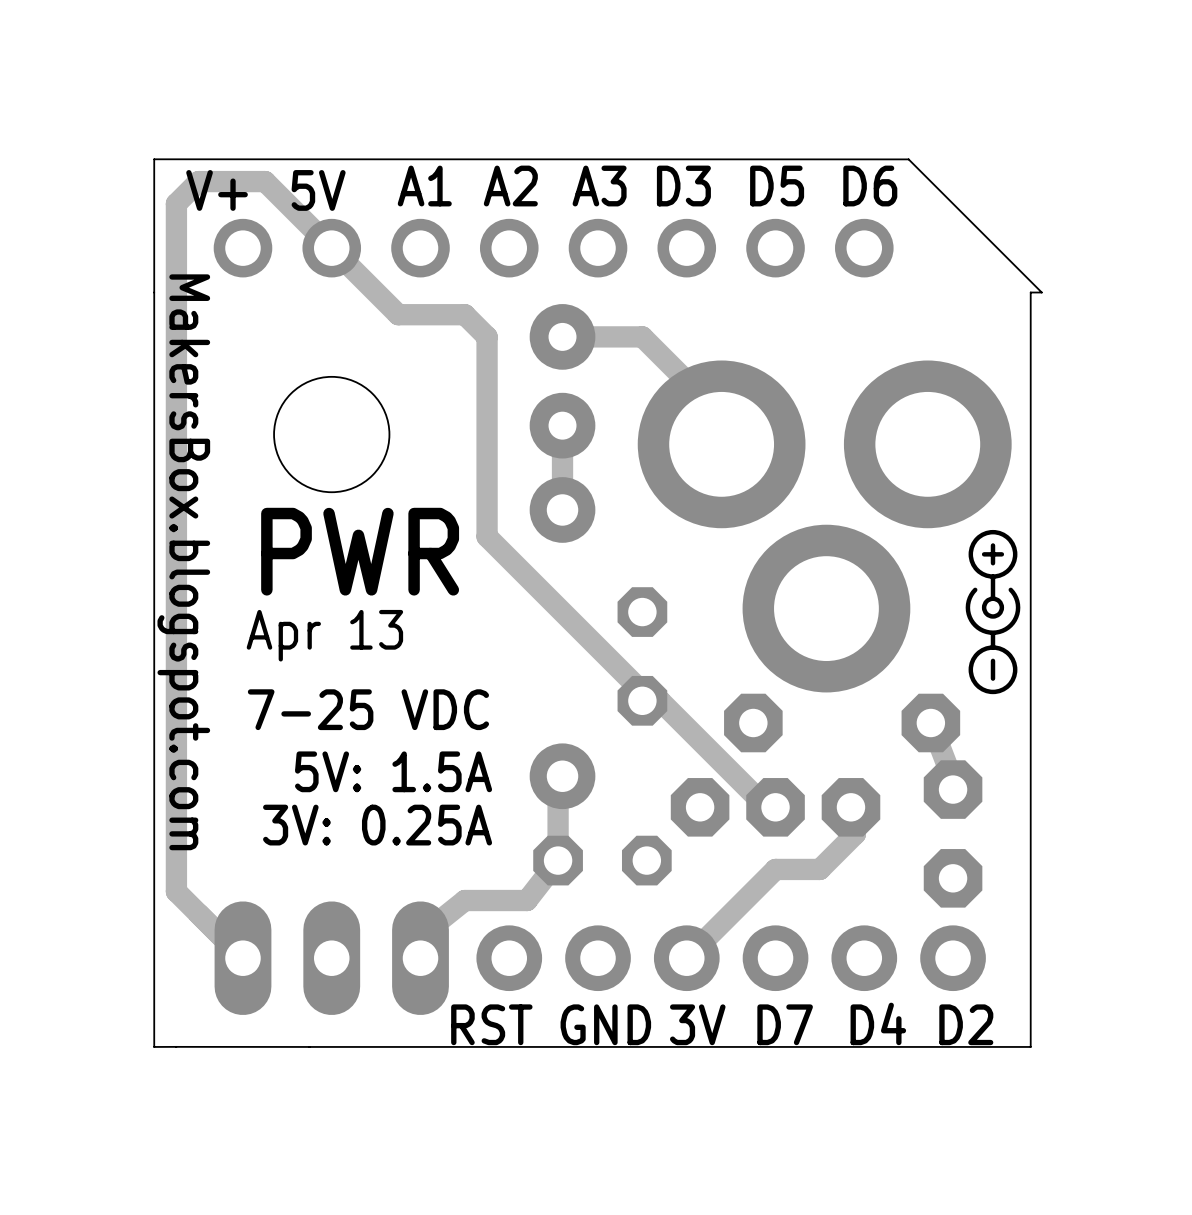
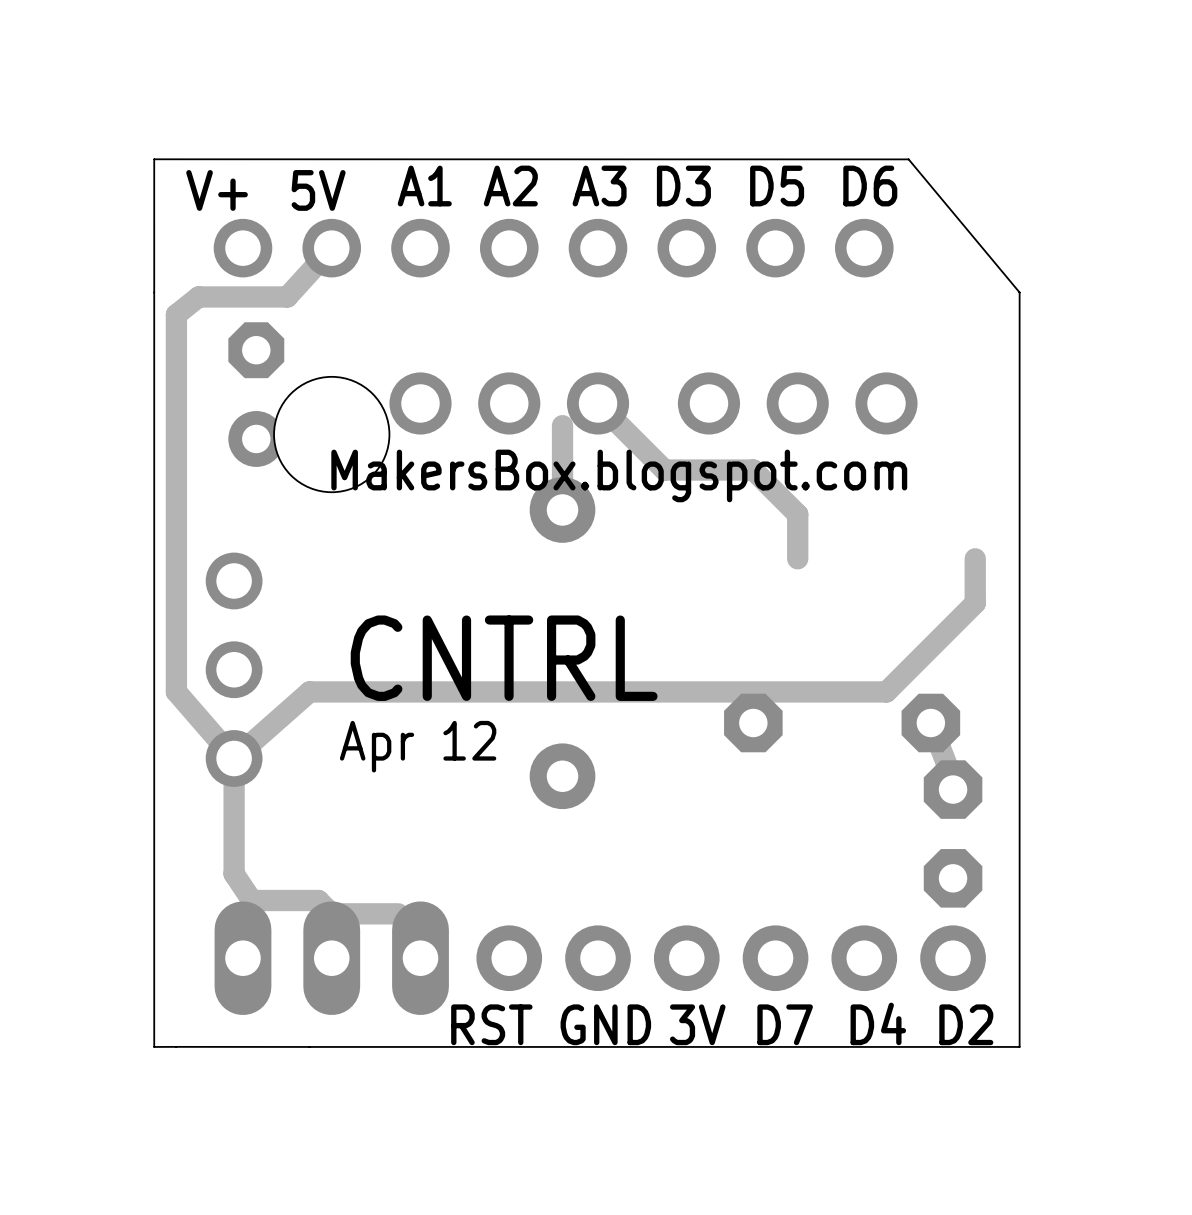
board edge: (908, 159) (1041, 292) (1030, 292) (1030, 1046) (1019, 1046) -> (908, 159) (1019, 292) (1019, 1046)
track: (176, 314) (176, 203) (198, 181) (265, 181) (398, 314) (464, 314) (487, 336) (487, 536) (642, 691) (642, 700) (660, 700) (766, 807) (775, 807) -> (176, 314) (198, 296) (287, 296) (331, 248)
track: (562, 336) (642, 336) (721, 416) (721, 444) -> none
part: (562, 381) -> none
part: none -> (256, 394)
part: none -> (509, 403)
track: none -> (598, 403) (664, 470) (753, 470) (797, 514) (797, 558)
part: none -> (797, 403)
part: (824, 526) -> none
drawing: [965, 529, 1021, 695] -> none
text: PWR (360, 551) -> none
track: none -> (975, 558) (975, 603) (886, 691) (309, 691) (234, 758)
text rotation: 0° (183, 562) -> 90° counterclockwise (619, 475)
text: Apr 13 (324, 635) -> none
part: (642, 656) -> none
text: none -> CNTRL (504, 658)
part: none -> (234, 669)
track: (176, 691) (176, 891) (242, 958) -> (176, 691) (234, 758)
text: 7-25 VDC (368, 709) -> none
text: none -> Apr 12 (418, 746)
track: none -> (234, 758) (234, 873) (251, 900) (318, 900) (331, 913) (398, 913)
text: 5V: 1.5A (393, 771) -> none
track: (562, 776) (558, 785) (558, 860) (527, 900) (464, 900) (420, 936) (420, 958) -> none
part: (775, 807) -> none
track: (850, 807) (855, 833) (819, 869) (775, 869) (686, 958) -> none
text: 3V: 0.25A (377, 825) -> none
part: (602, 860) -> none

